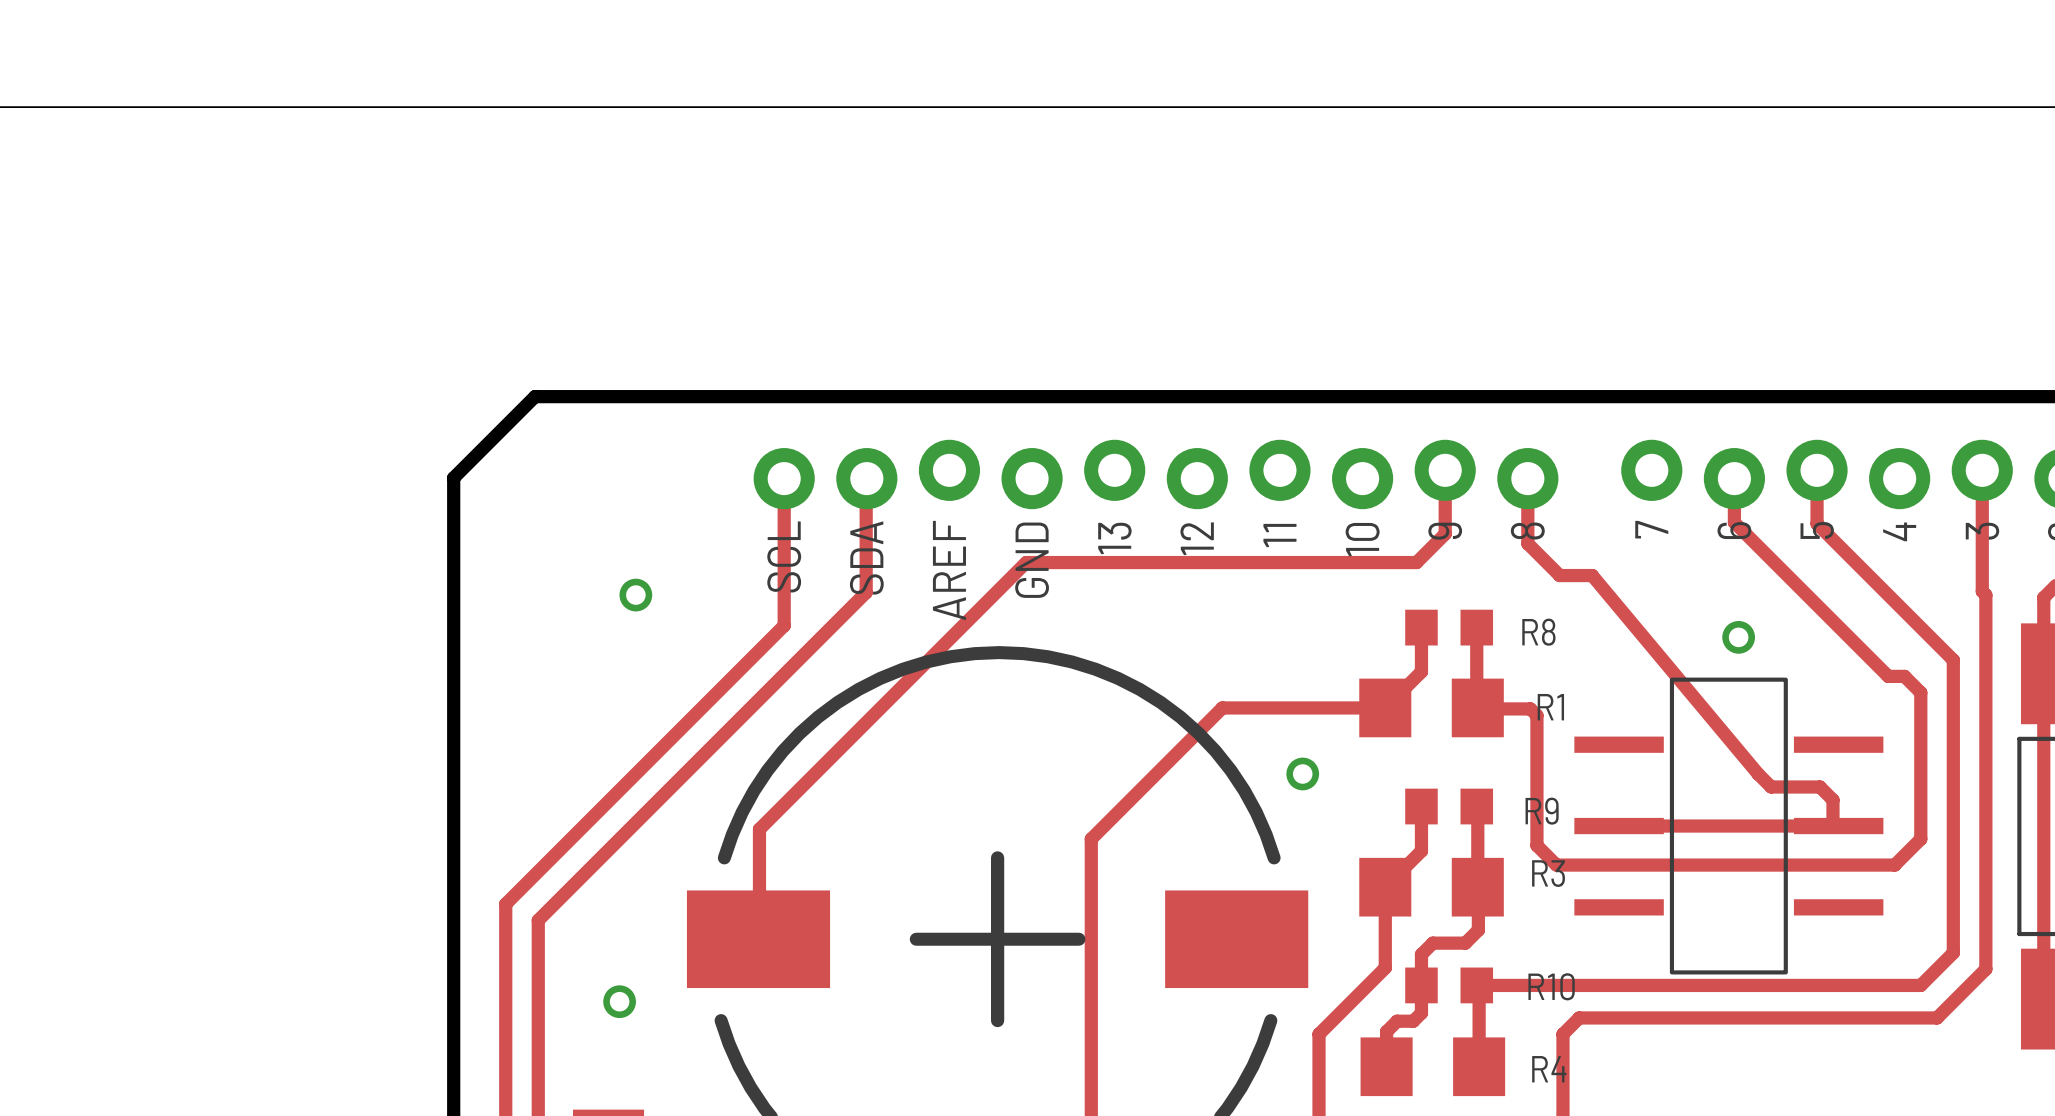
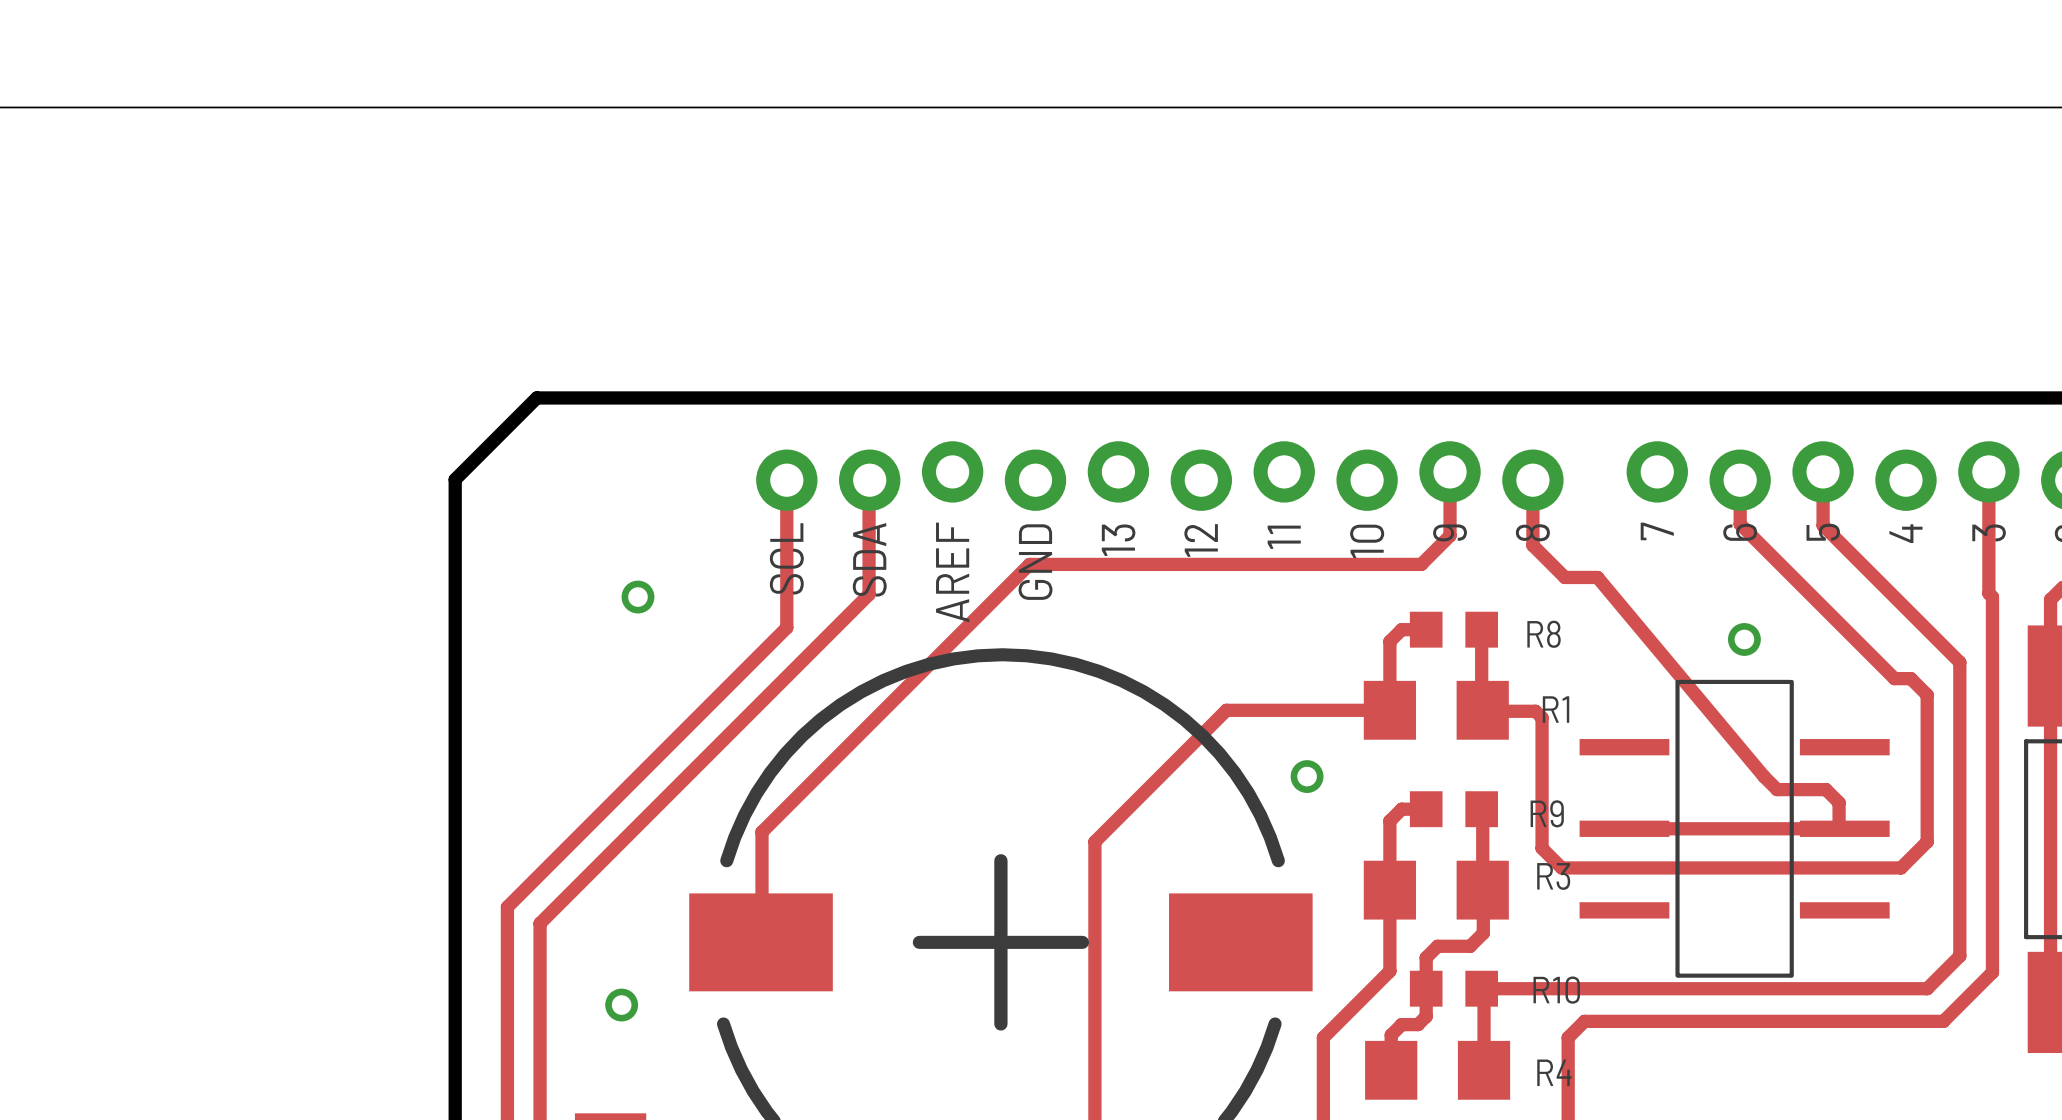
track: (1421, 627) (1421, 671) (1385, 707) -> (1426, 629) (1401, 629) (1389, 641) (1389, 710)
track: (1421, 806) (1421, 851) (1385, 887) -> (1426, 809) (1401, 809) (1389, 821) (1389, 890)

